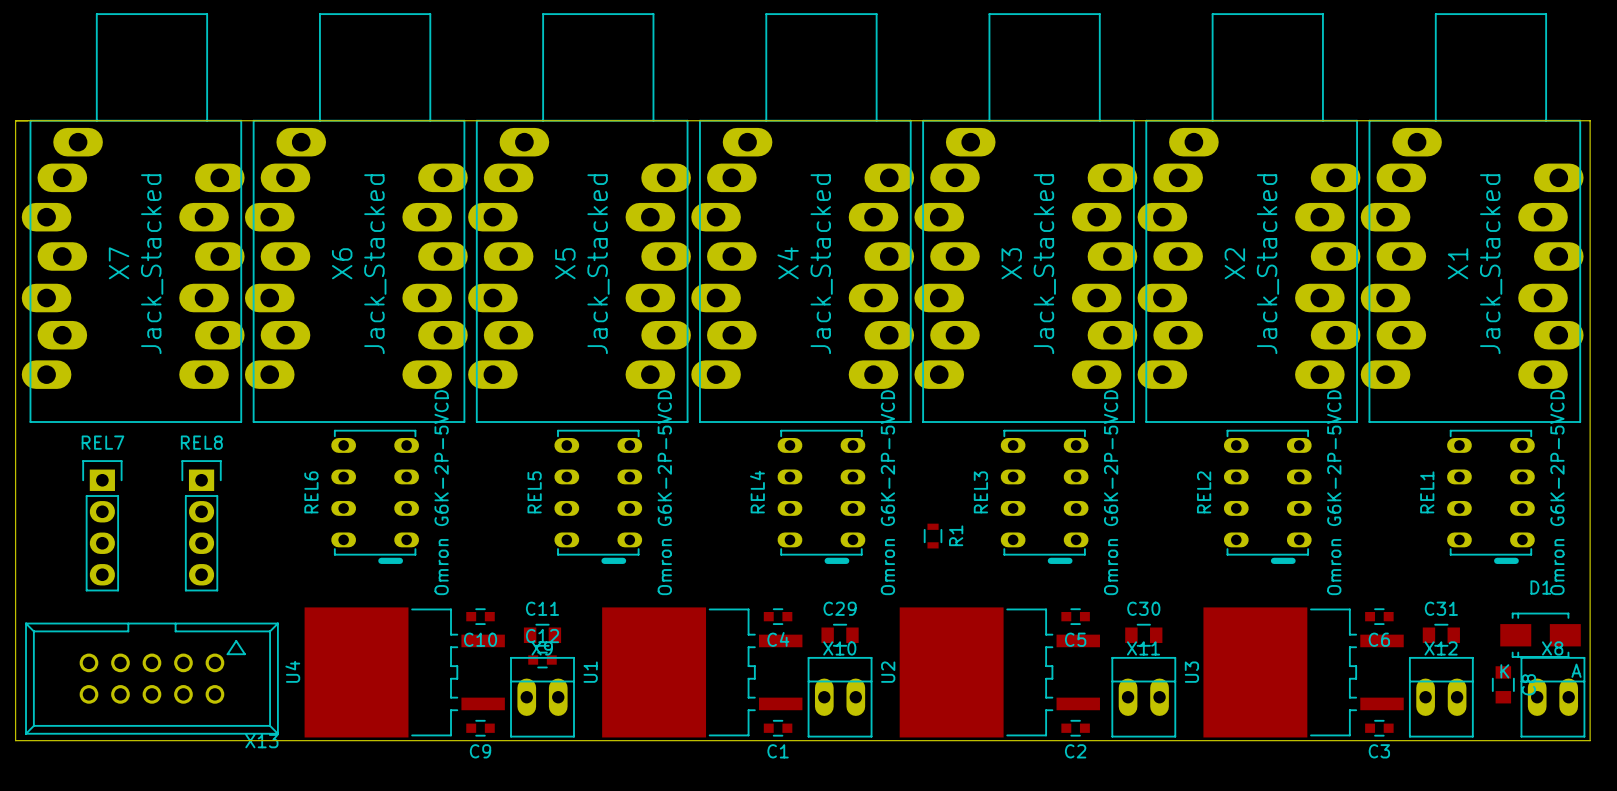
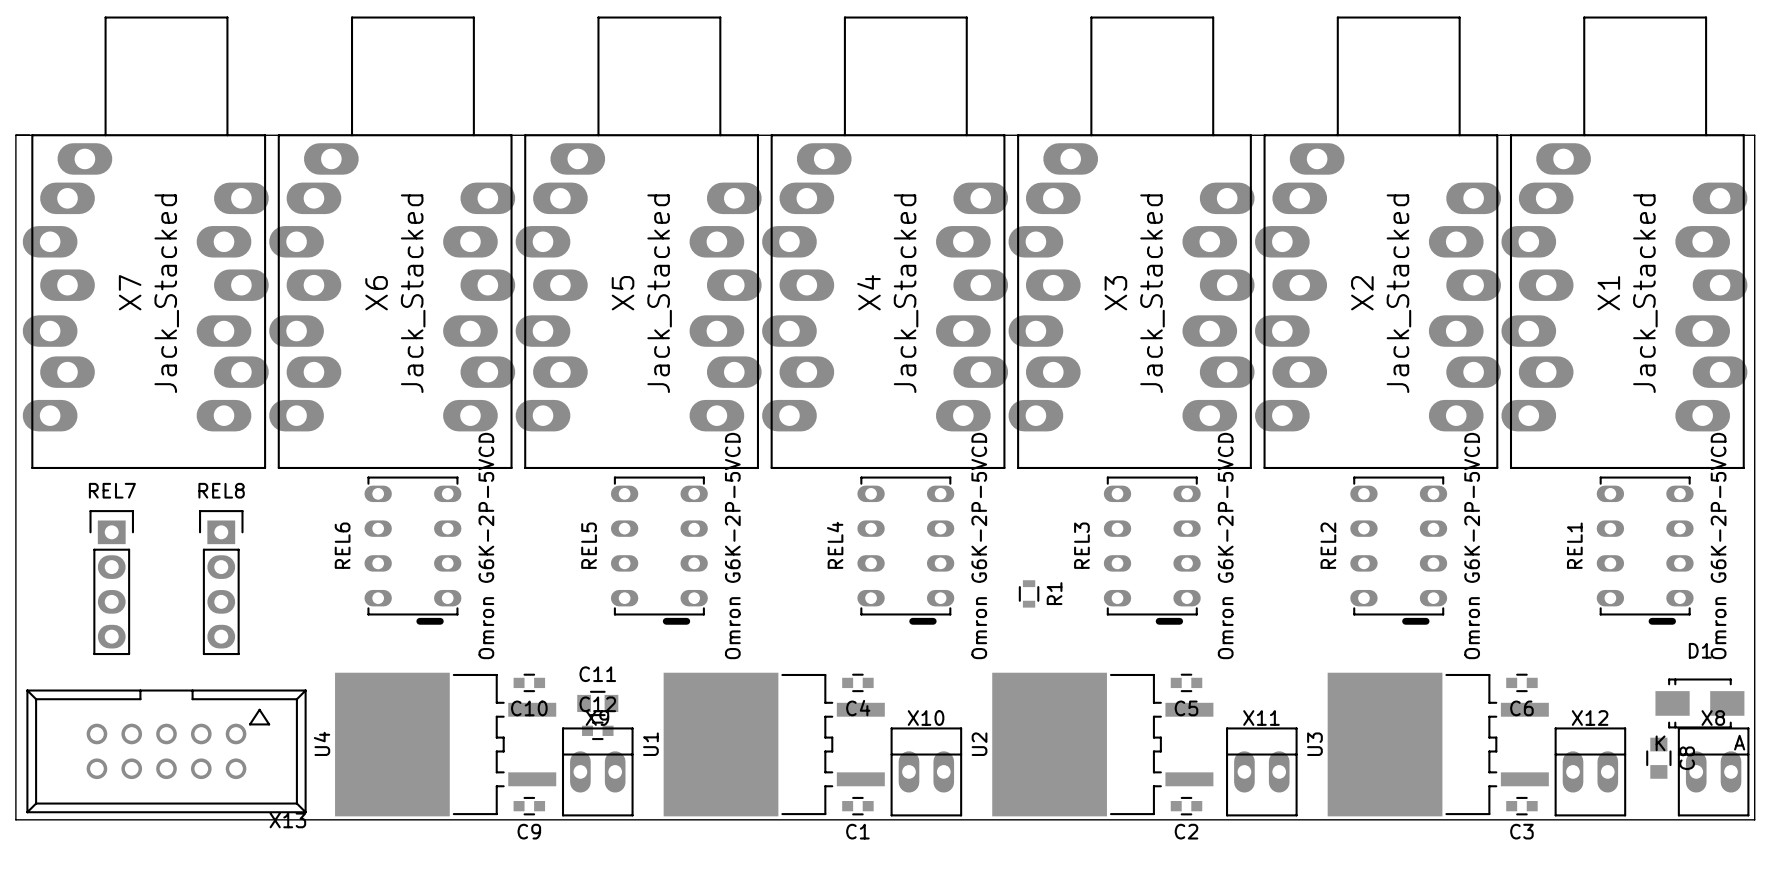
C29: (840, 635) -> none
C30: (1143, 635) -> none
C31: (1441, 635) -> none

